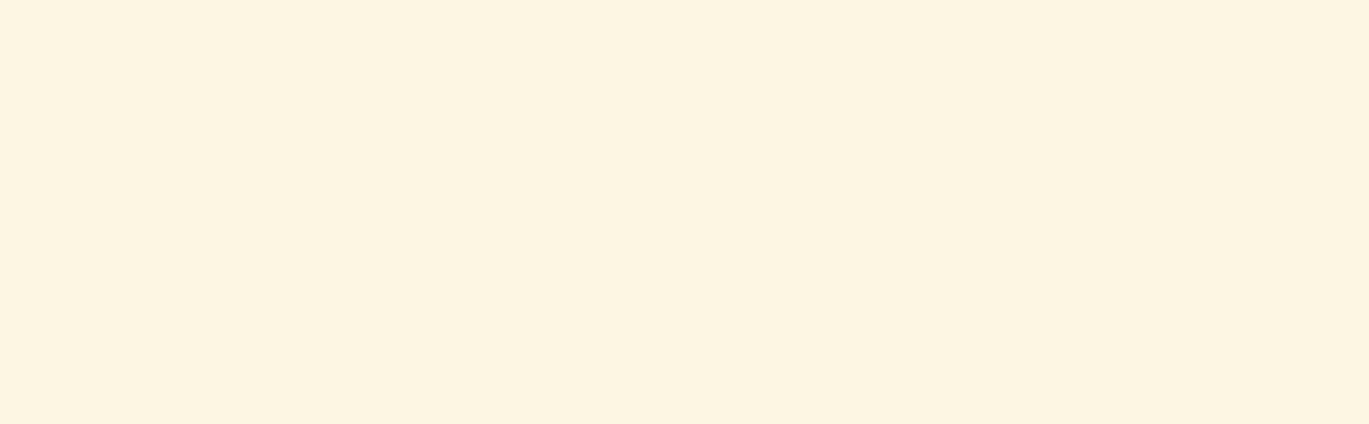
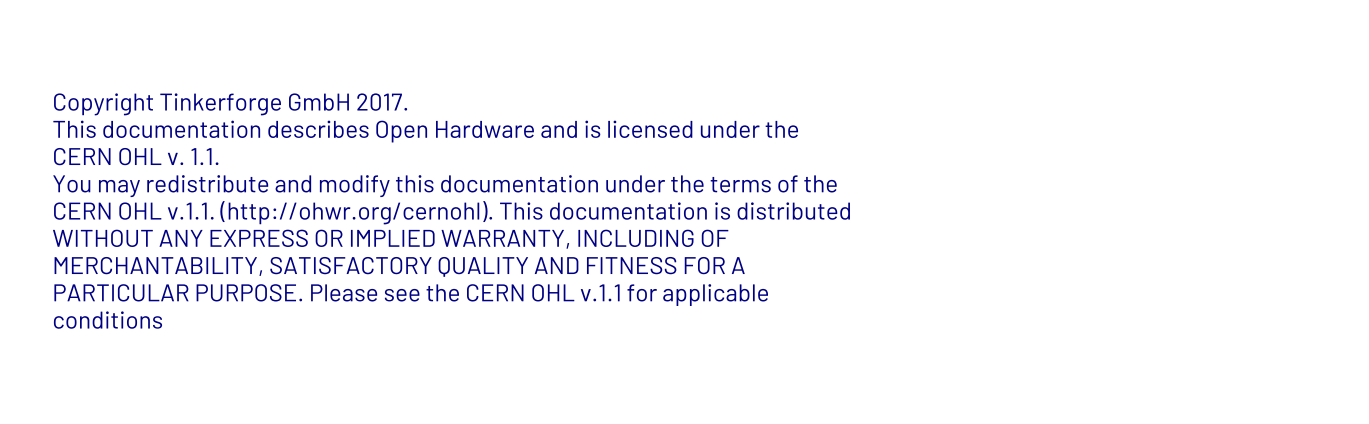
text: none -> Copyright Tinkerforge GmbH 2017. (230, 104)
text: none -> This documentation describes Open Hardware and is licensed under the (425, 131)
text: none -> CERN OHL v. 1.1. (136, 156)
text: none -> You may redistribute and modify this documentation under the terms of the (444, 186)
text: none -> CERN OHL v.1.1. (http://ohwr.org/cernohl). This documentation is distributed (452, 212)
text: none -> WITHOUT ANY EXPRESS OR IMPLIED WARRANTY, INCLUDING OF (390, 239)
text: none -> MERCHANTABILITY, SATISFACTORY QUALITY AND FITNESS FOR A (399, 266)
text: none -> PARTICULAR PURPOSE. Please see the CERN OHL v.1.1 for applicable (411, 295)
text: none -> conditions (107, 320)

